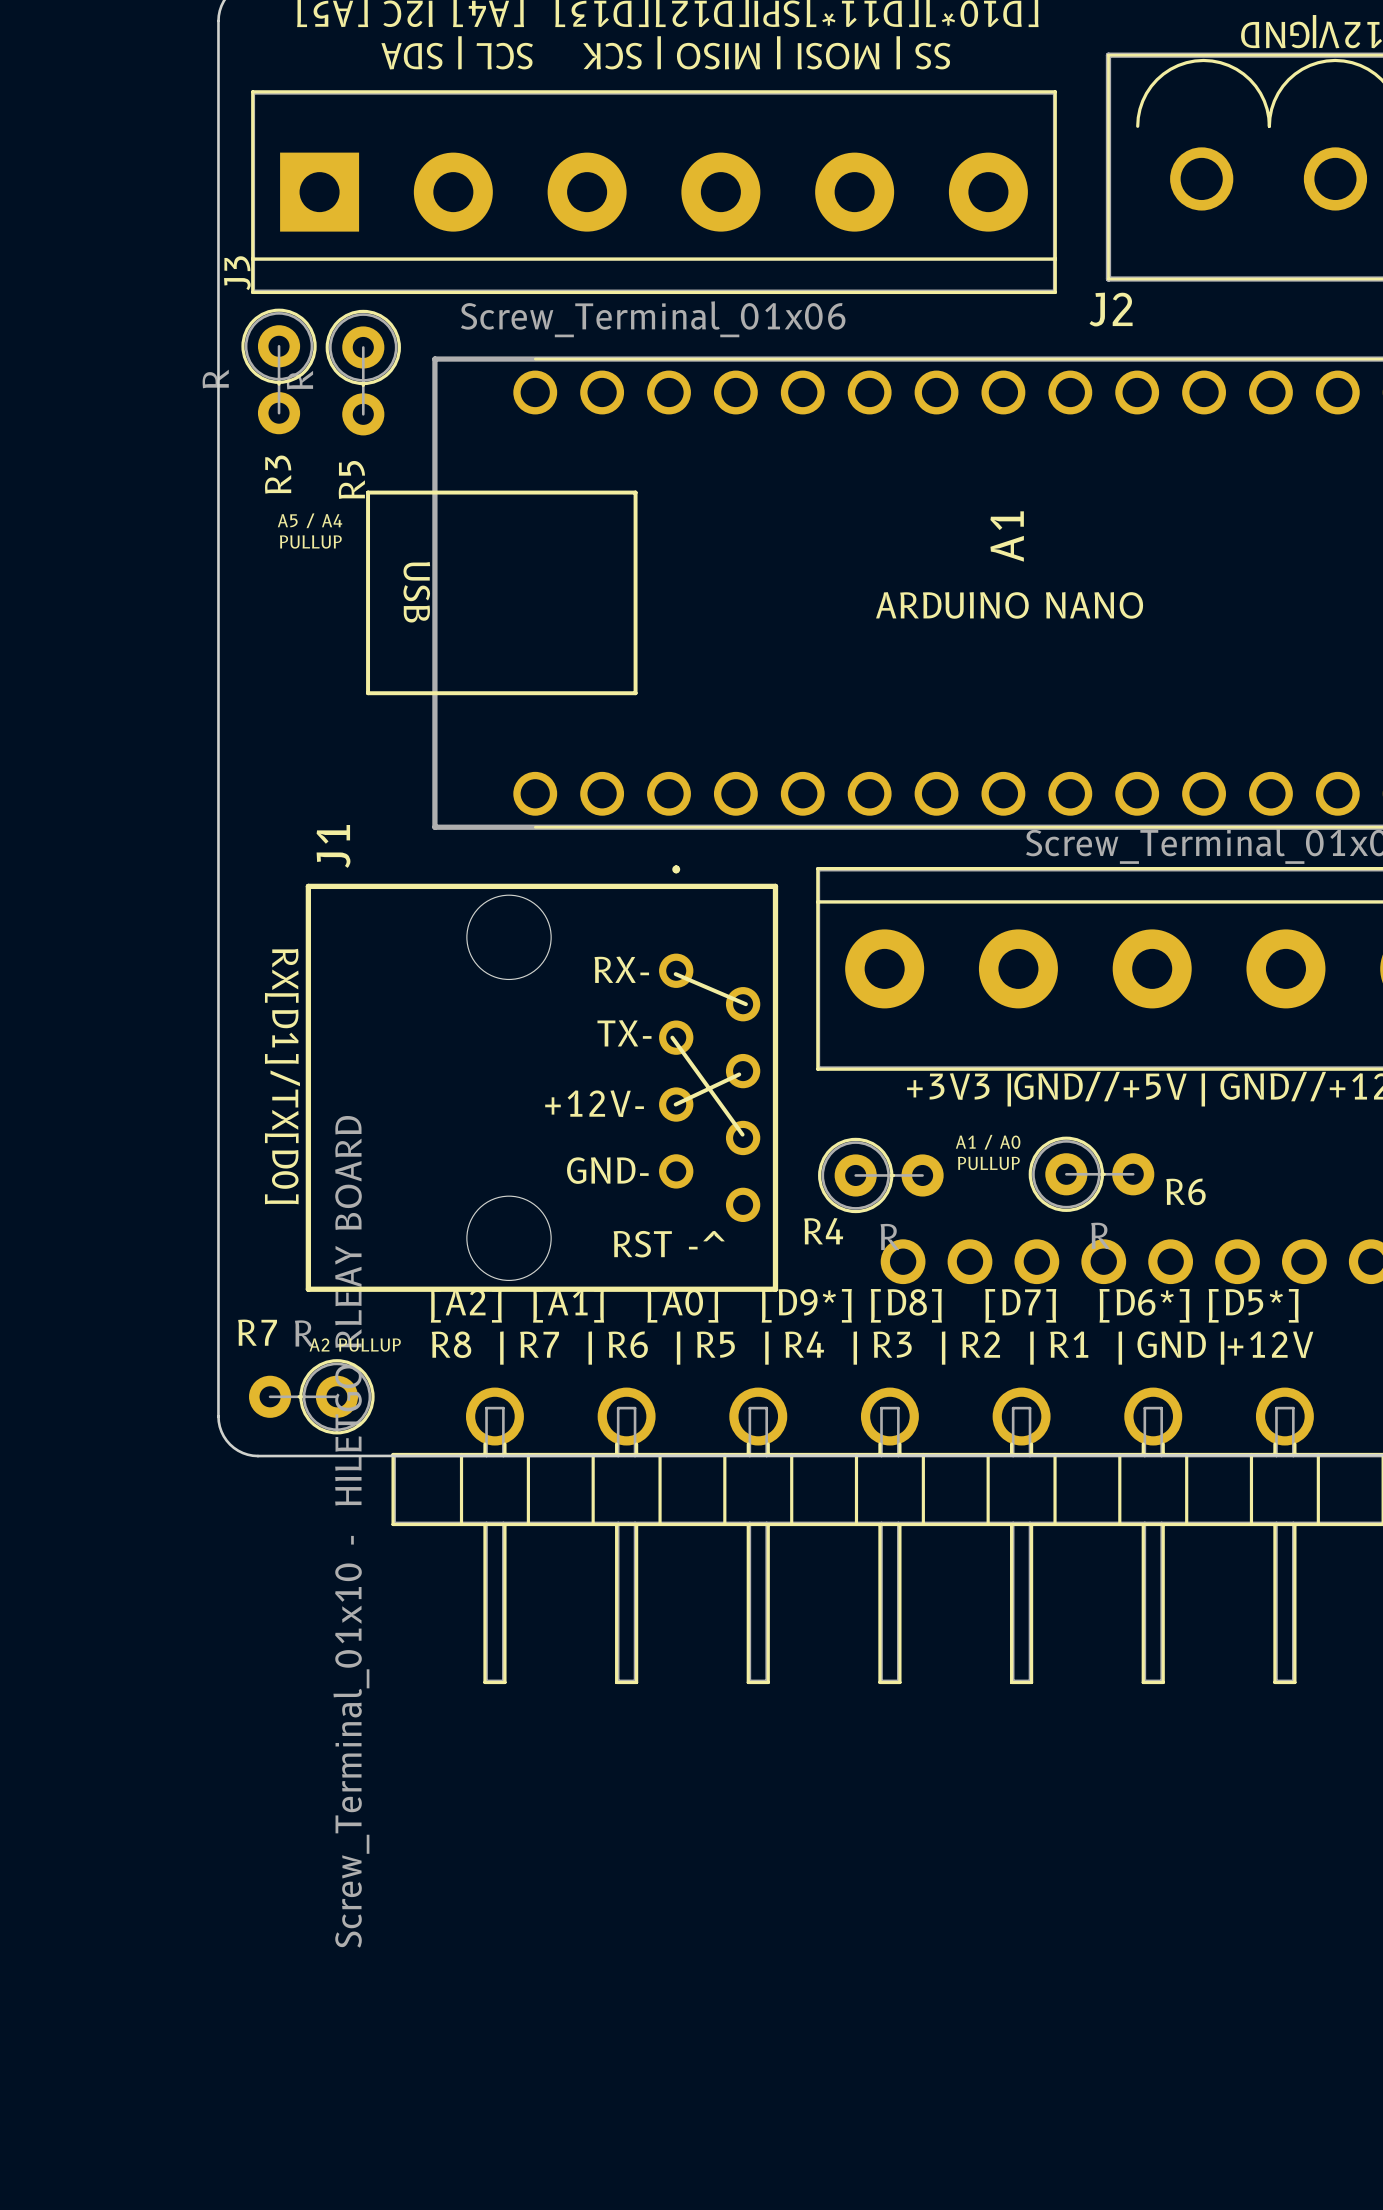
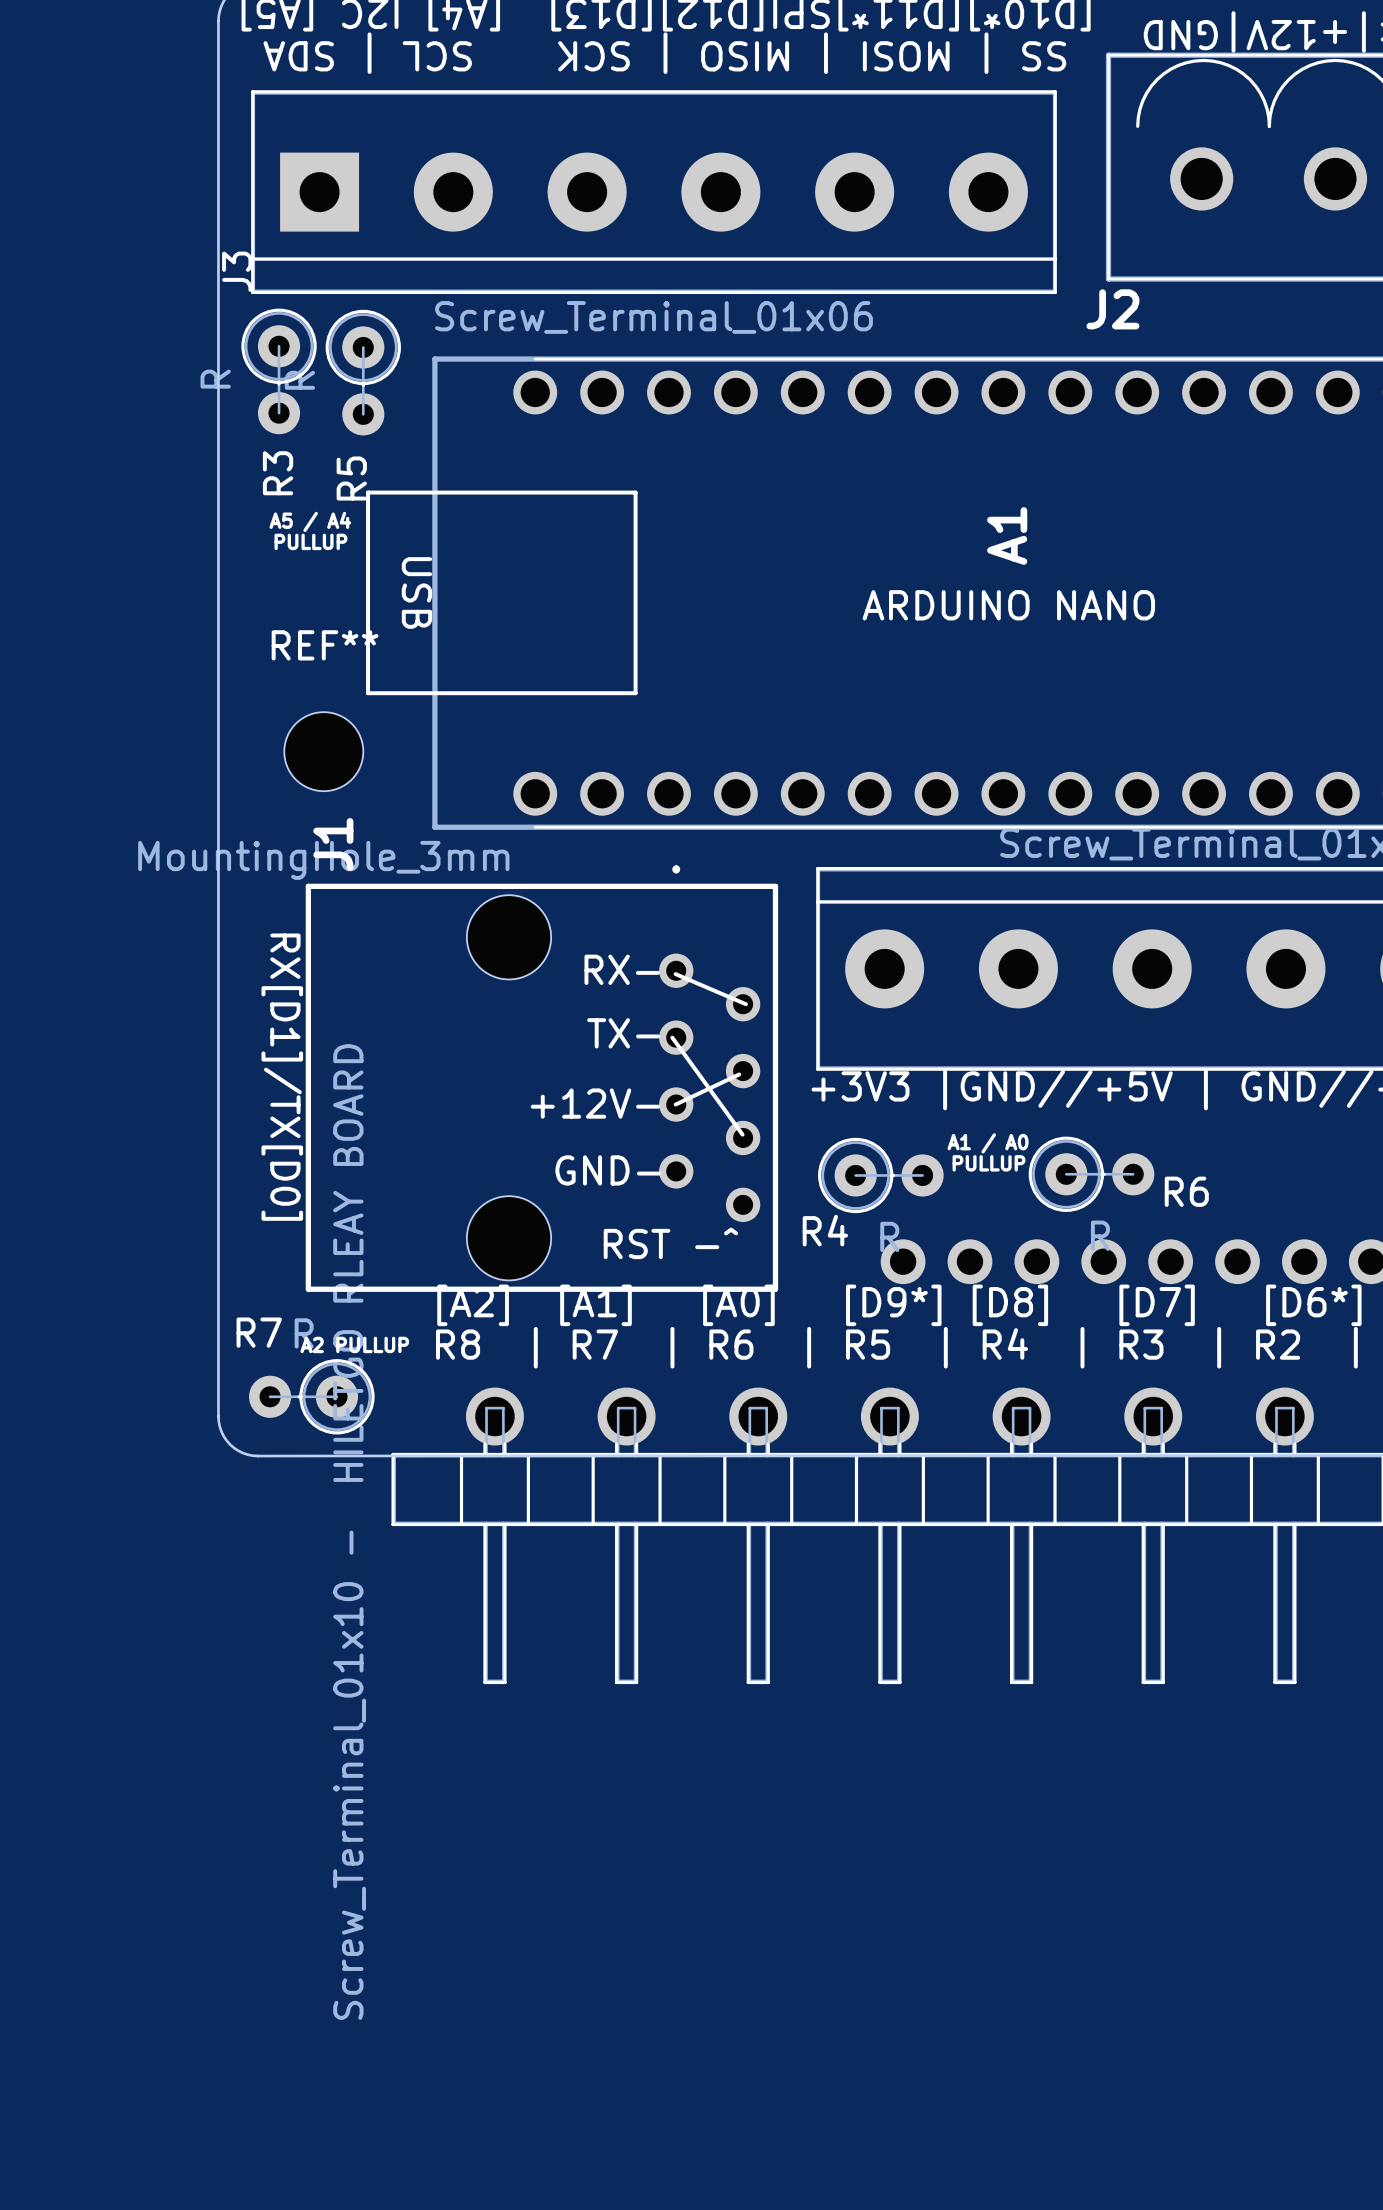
REF**: none -> MountingHole_3mm (323, 751)

